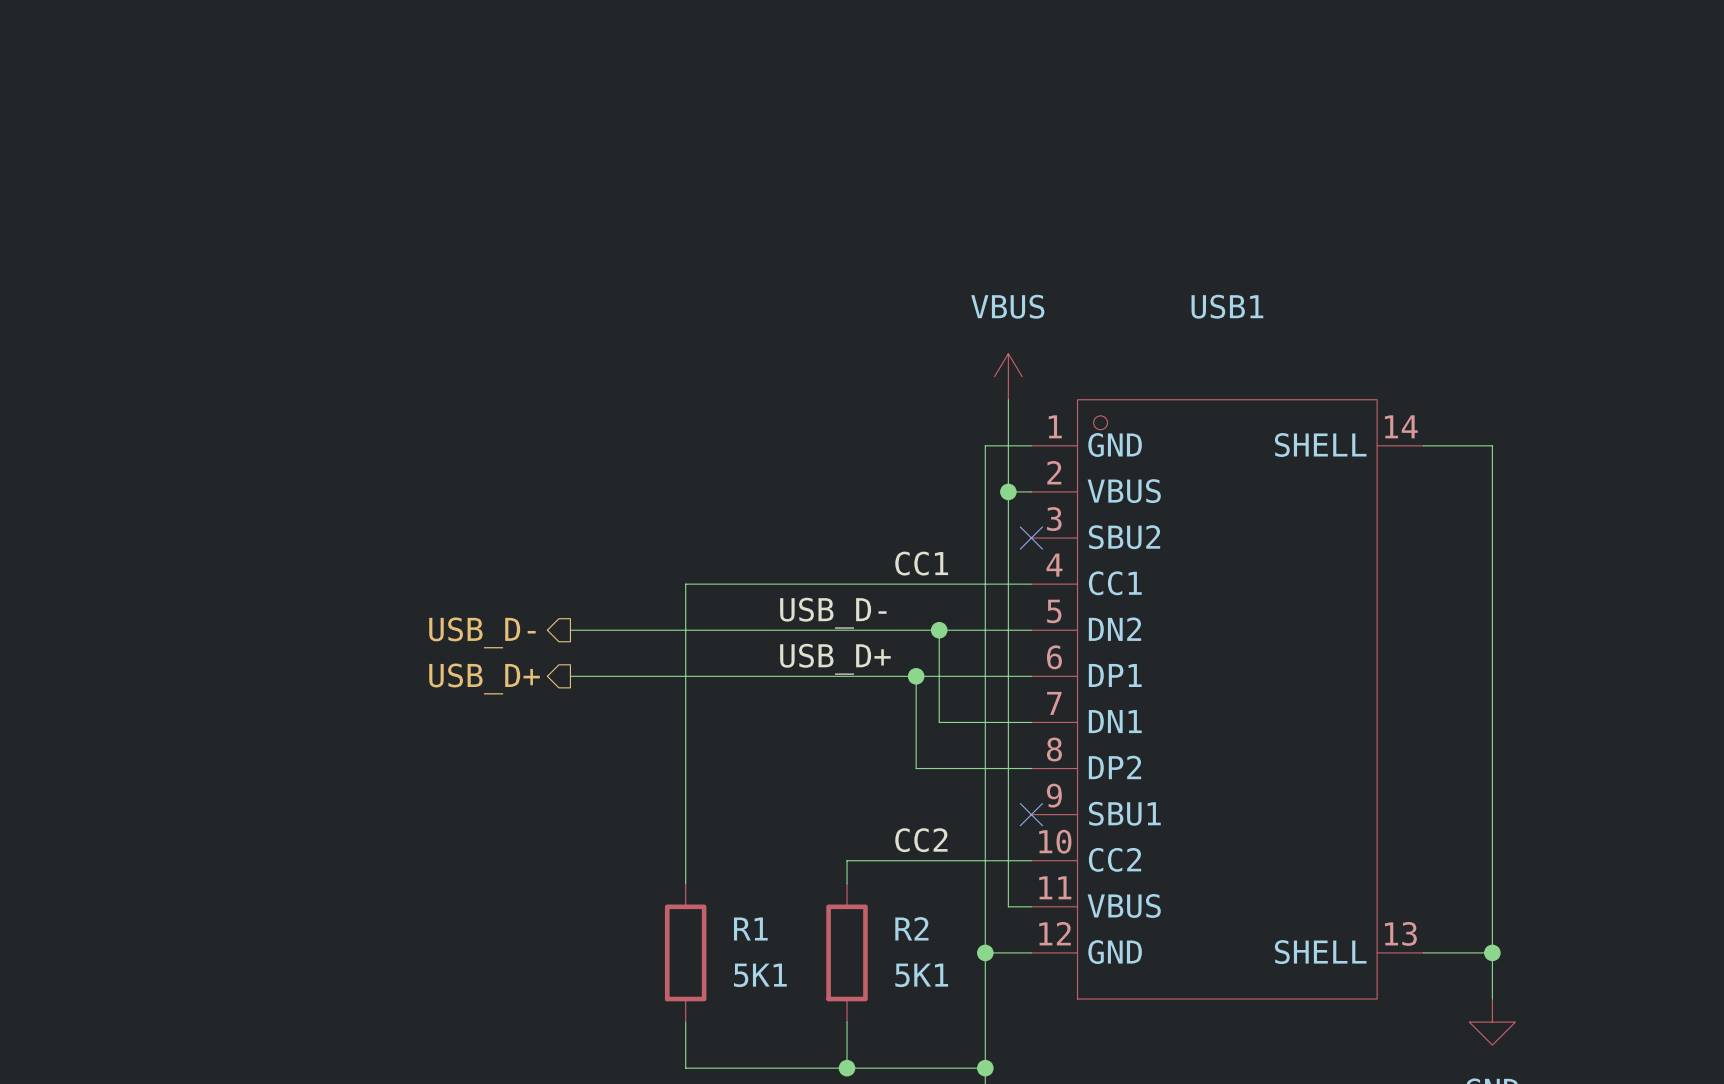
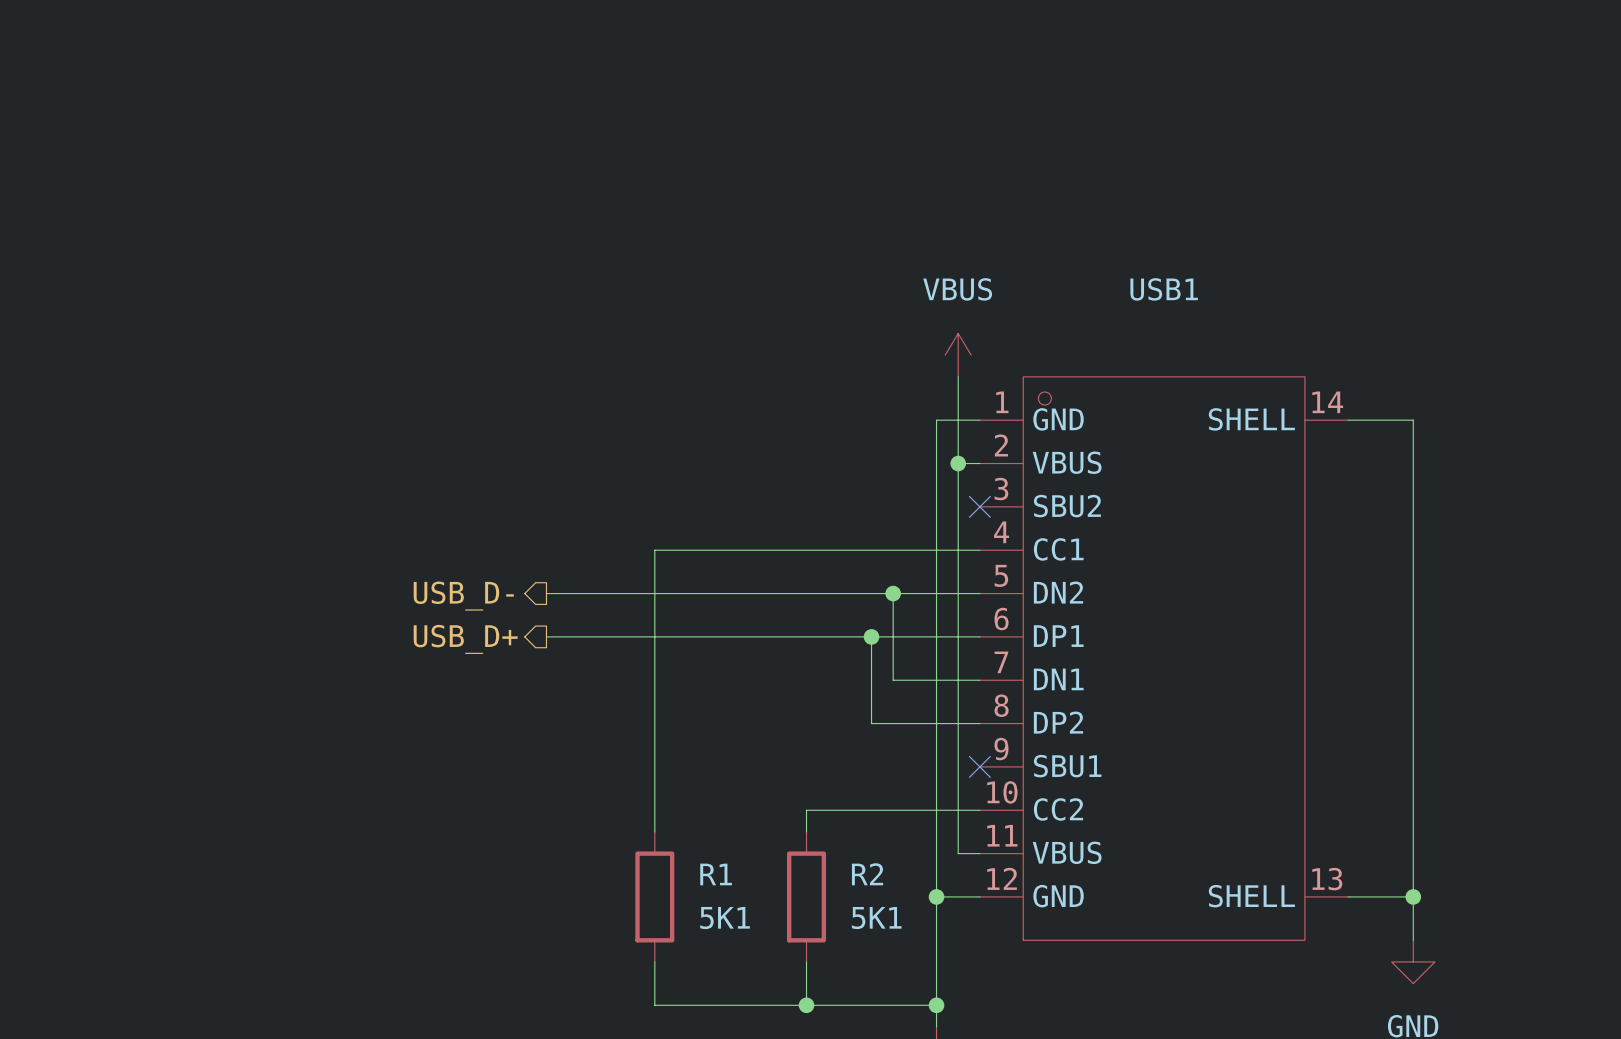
label: CC1 (921, 563) -> none
label: USB_D- (833, 613) -> none
label: USB_D+ (835, 659) -> none
label: CC2 (921, 840) -> none

